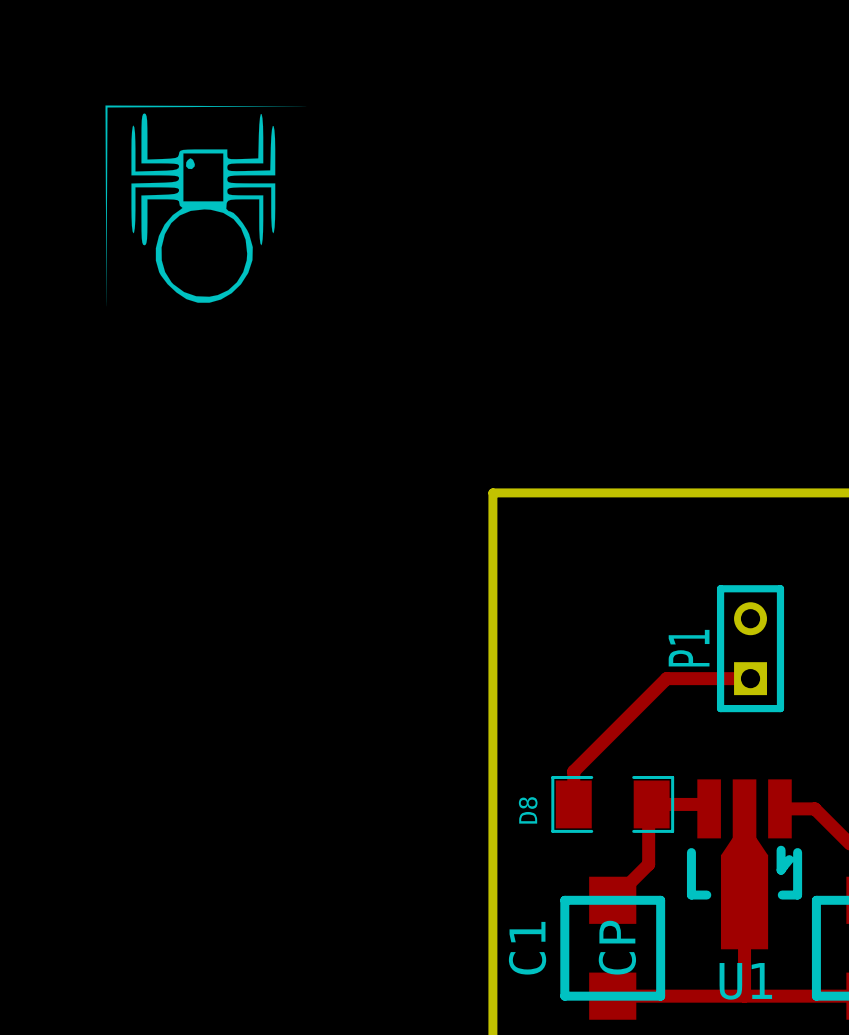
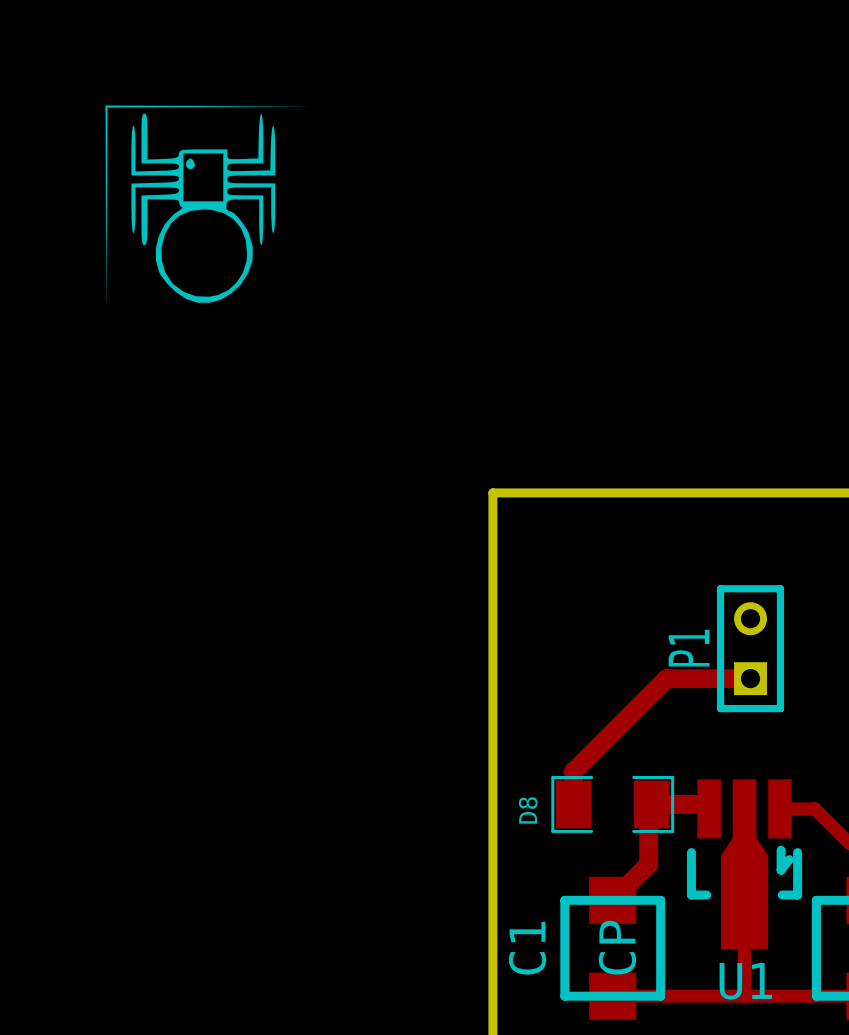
track width: thin (750, 678) (666, 678) (573, 771) (573, 804) -> thick (750, 678) (666, 678) (573, 771) (573, 804)
track width: thin (709, 808) (704, 804) (651, 804) (648, 807) (648, 864) (612, 900) -> thick (709, 808) (704, 804) (651, 804) (648, 807) (648, 864) (612, 900)

